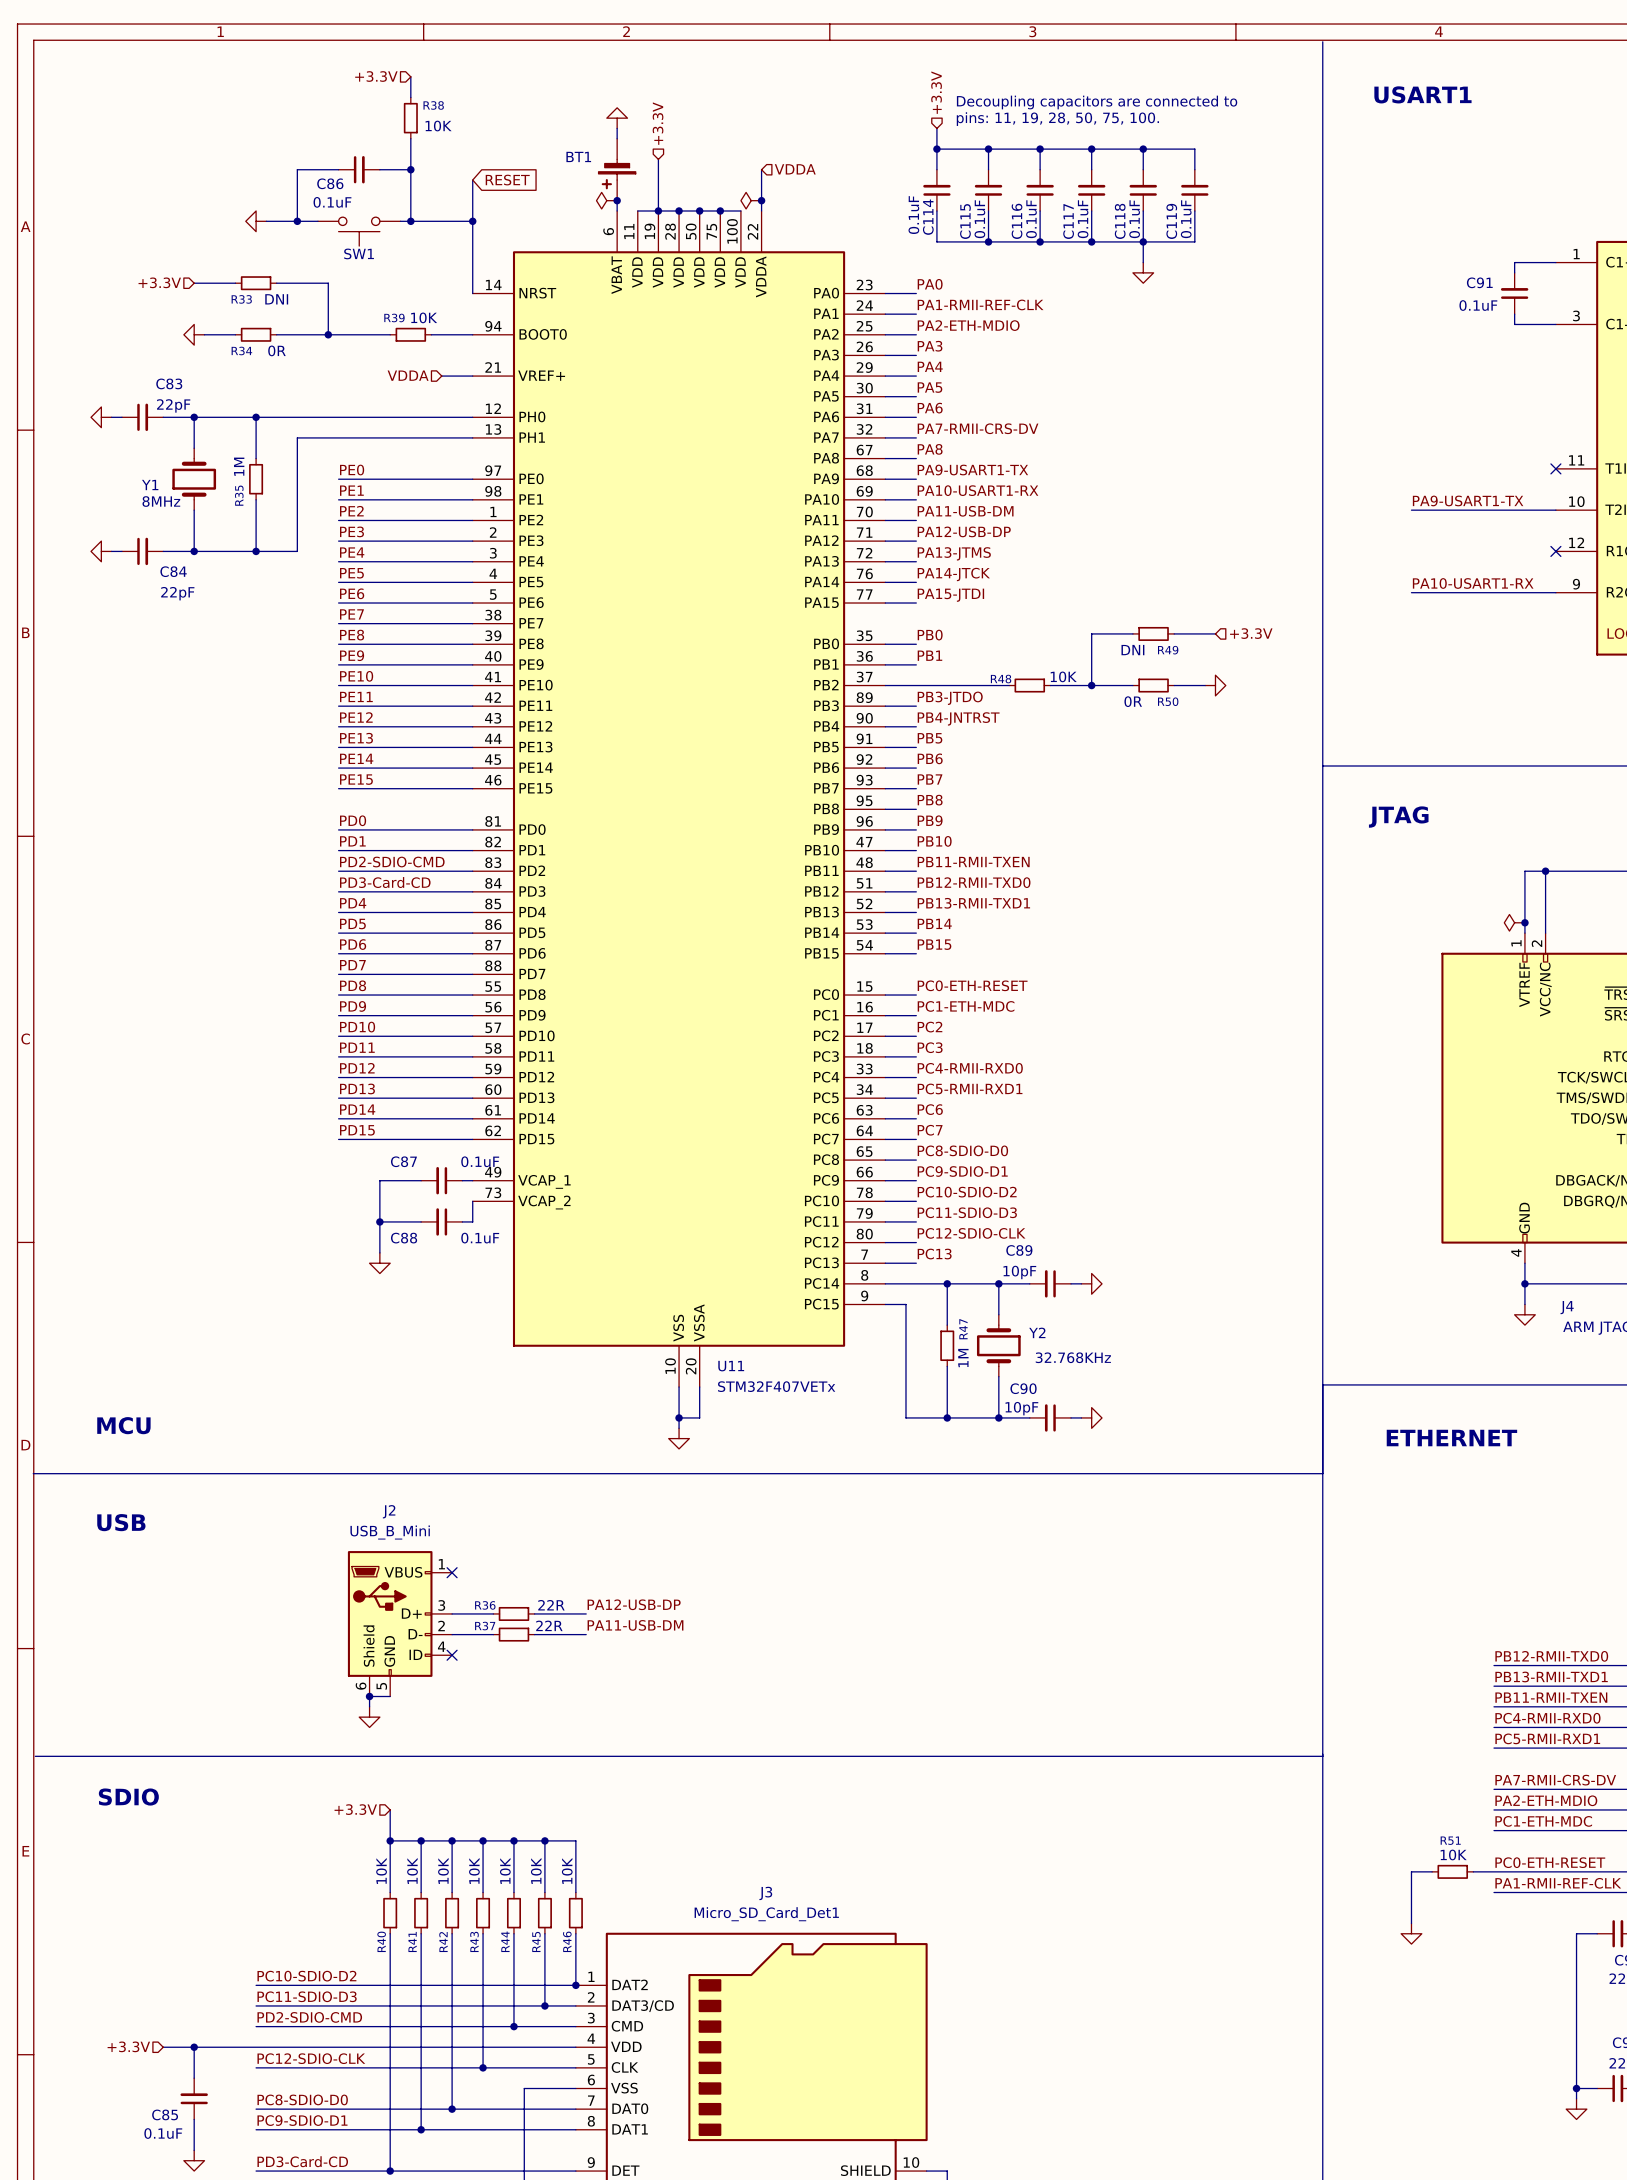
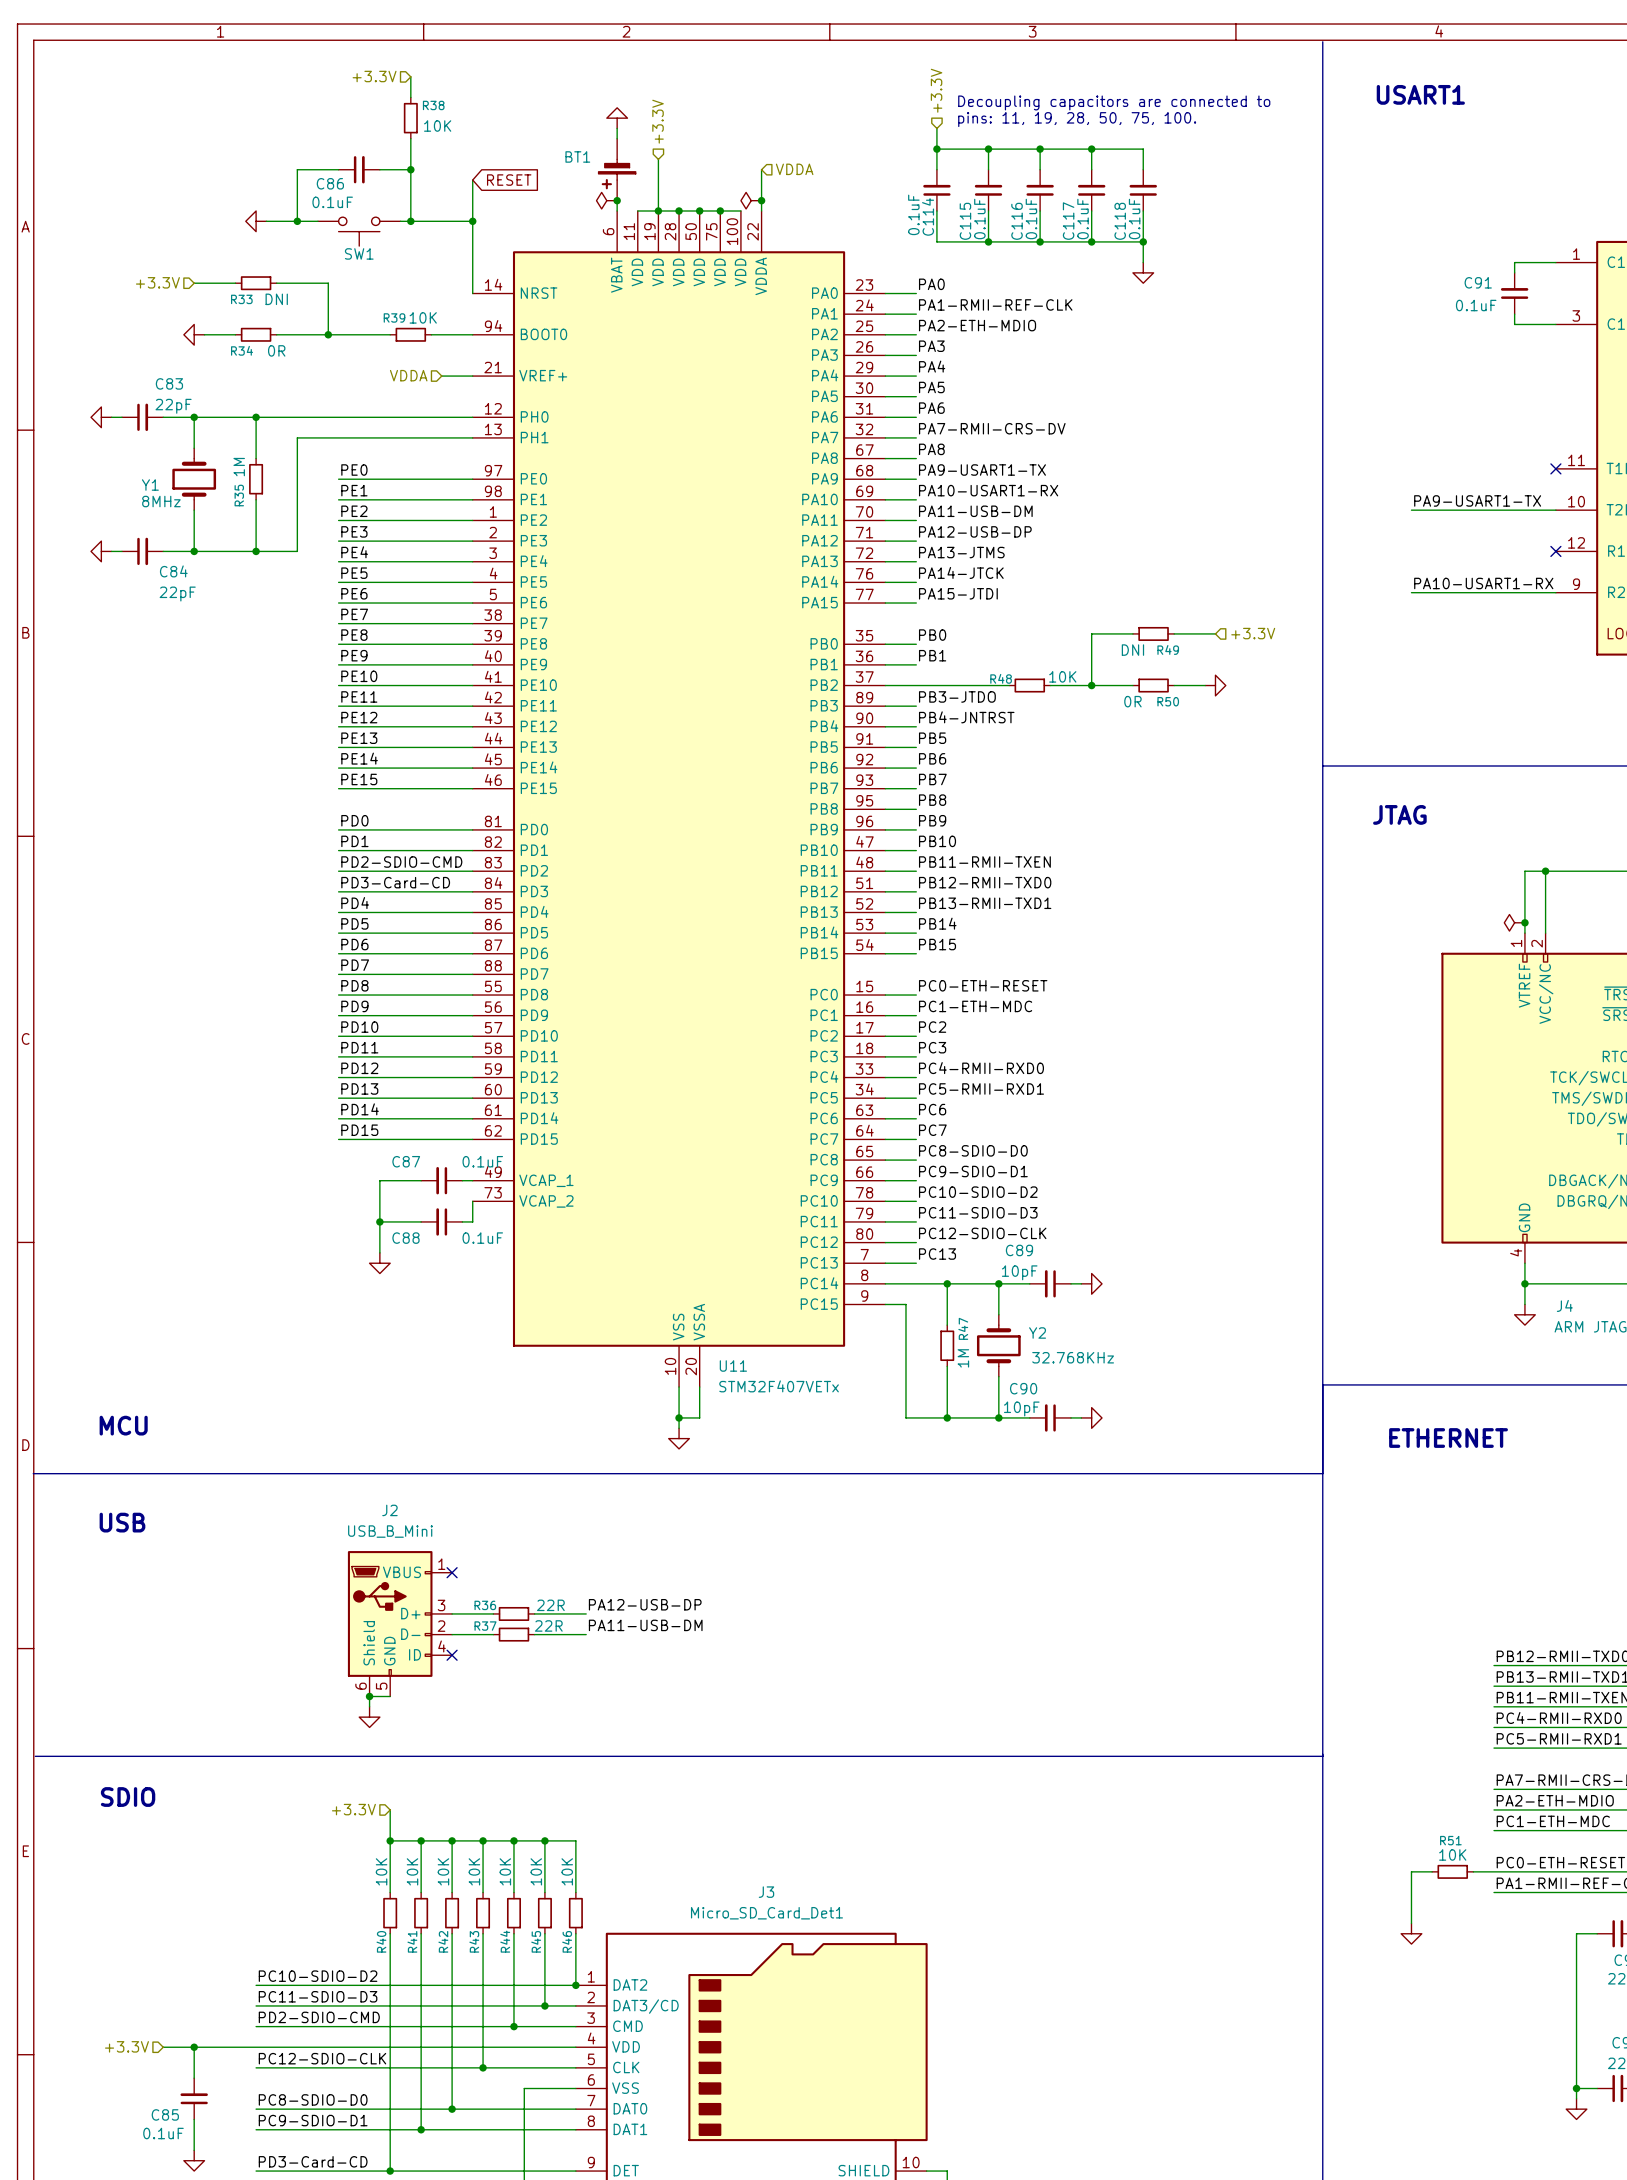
wire: (1143, 149) (1194, 149) (1194, 169) -> none
junction: (1143, 149) -> none
C119: 0.1uF (1194, 190) -> none
wire: (1194, 210) (1194, 241) (1143, 241) -> none

